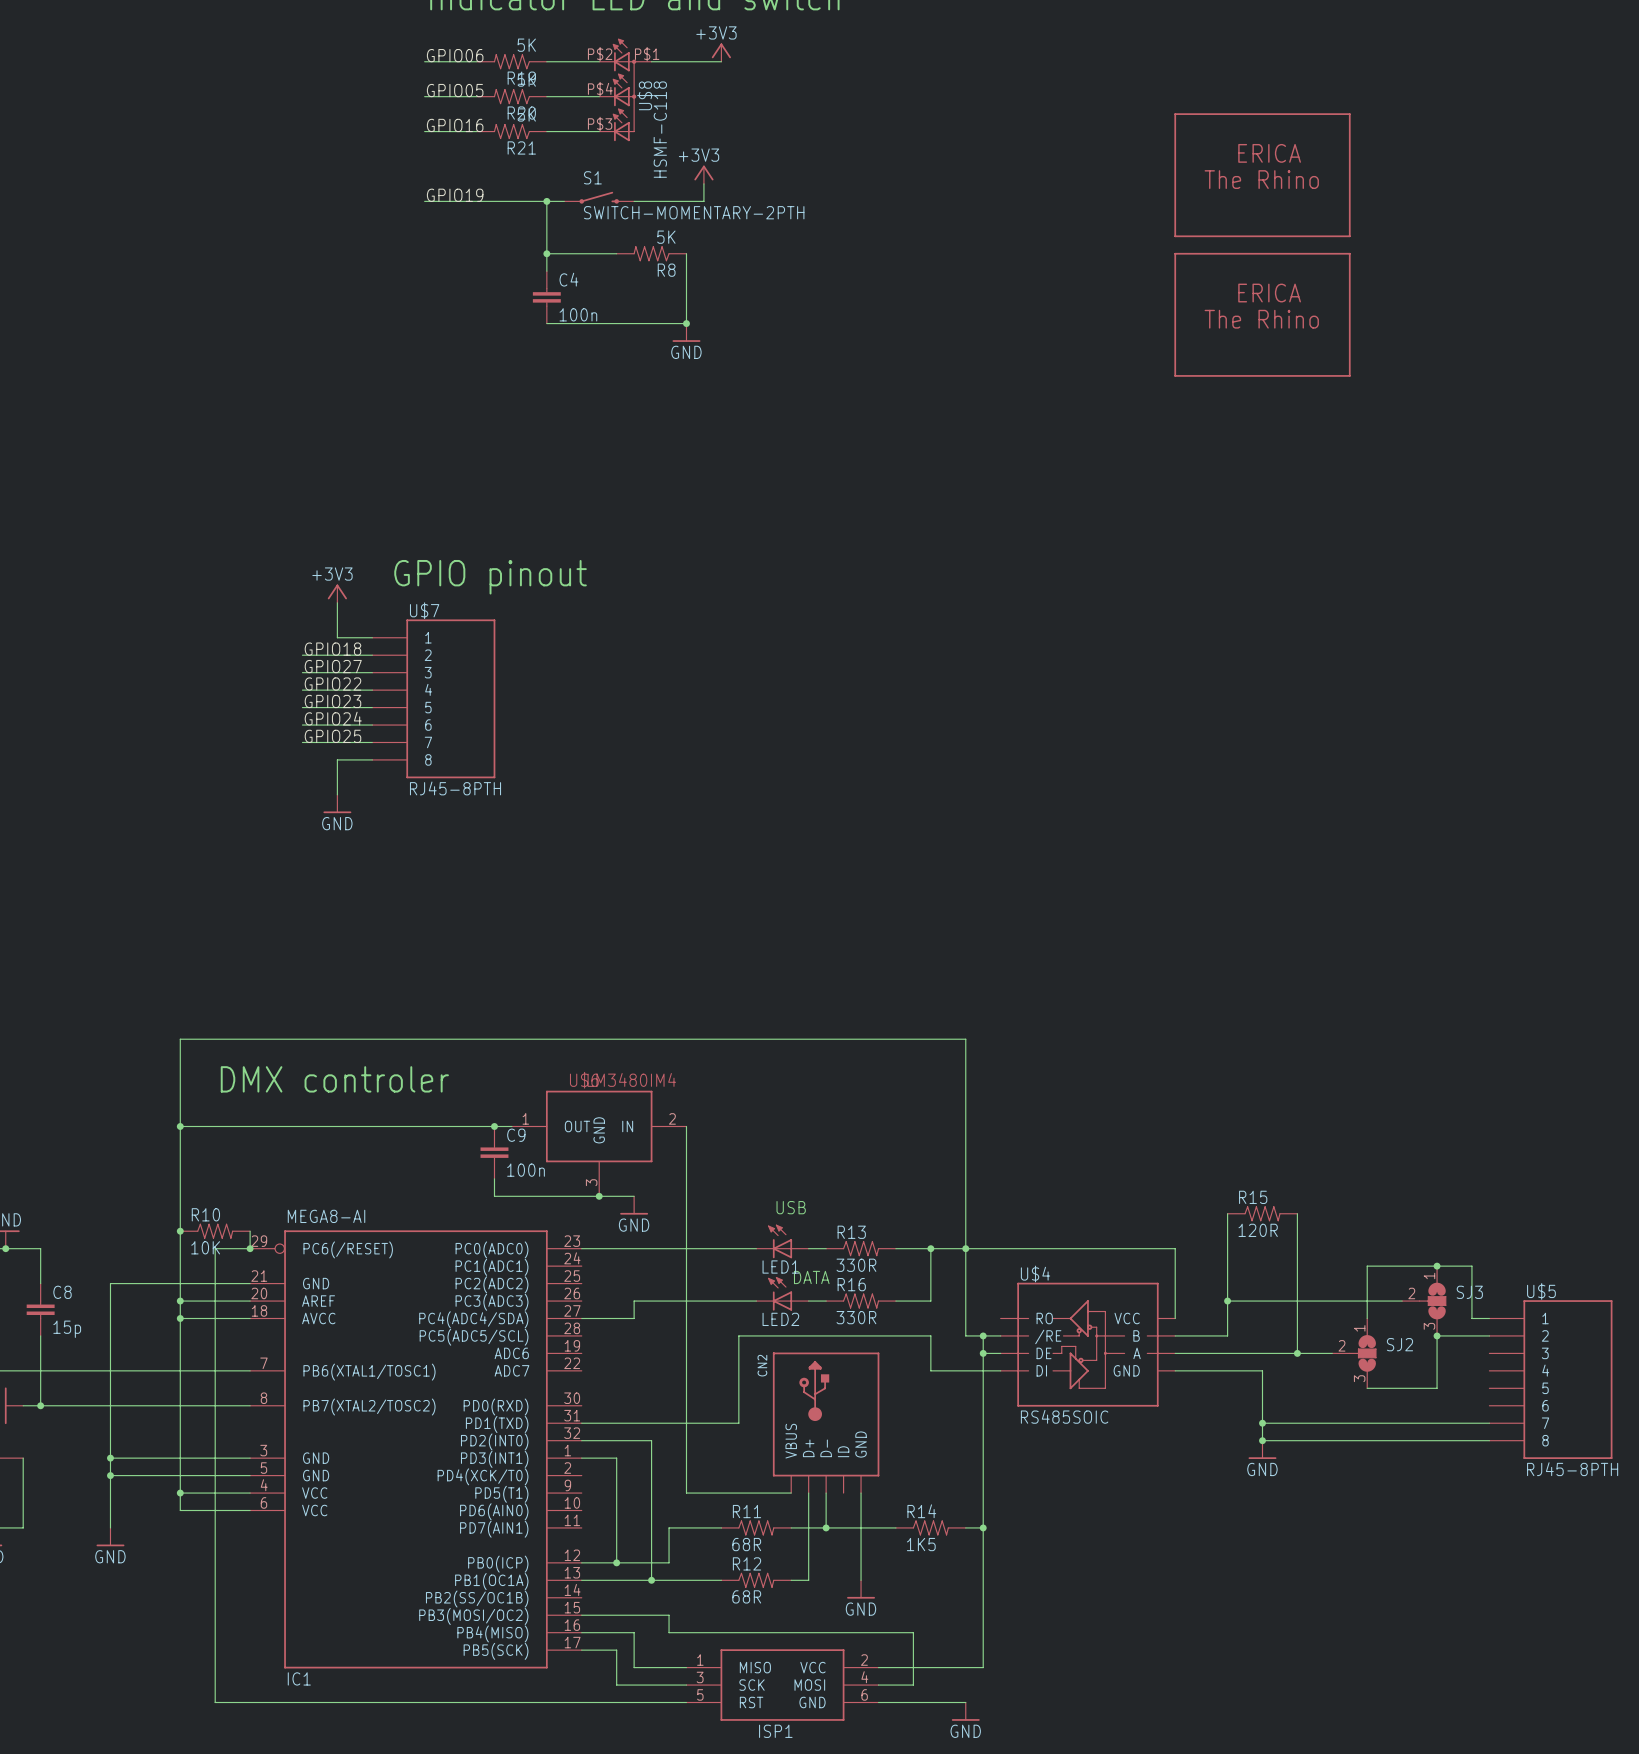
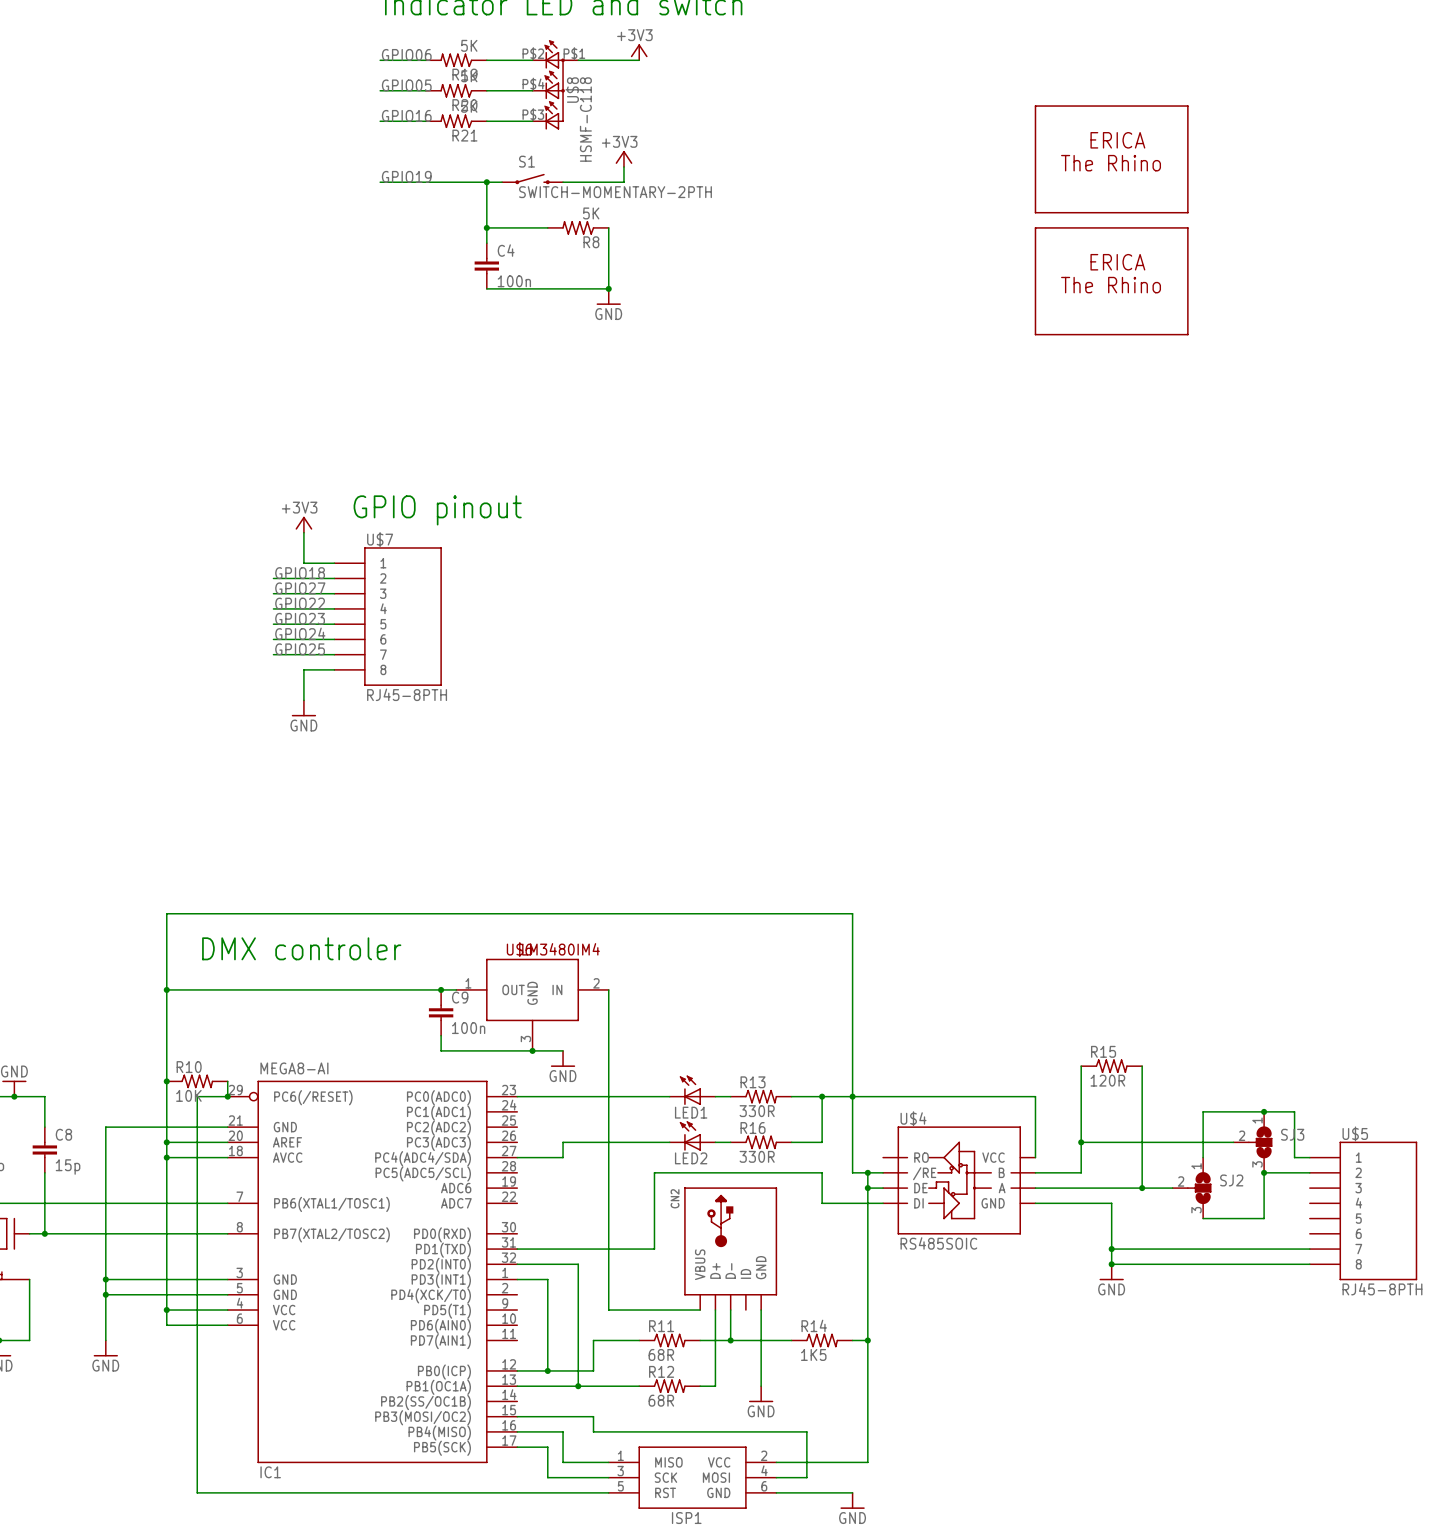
text: USB (791, 1207) -> none
text: DATA (811, 1277) -> none

